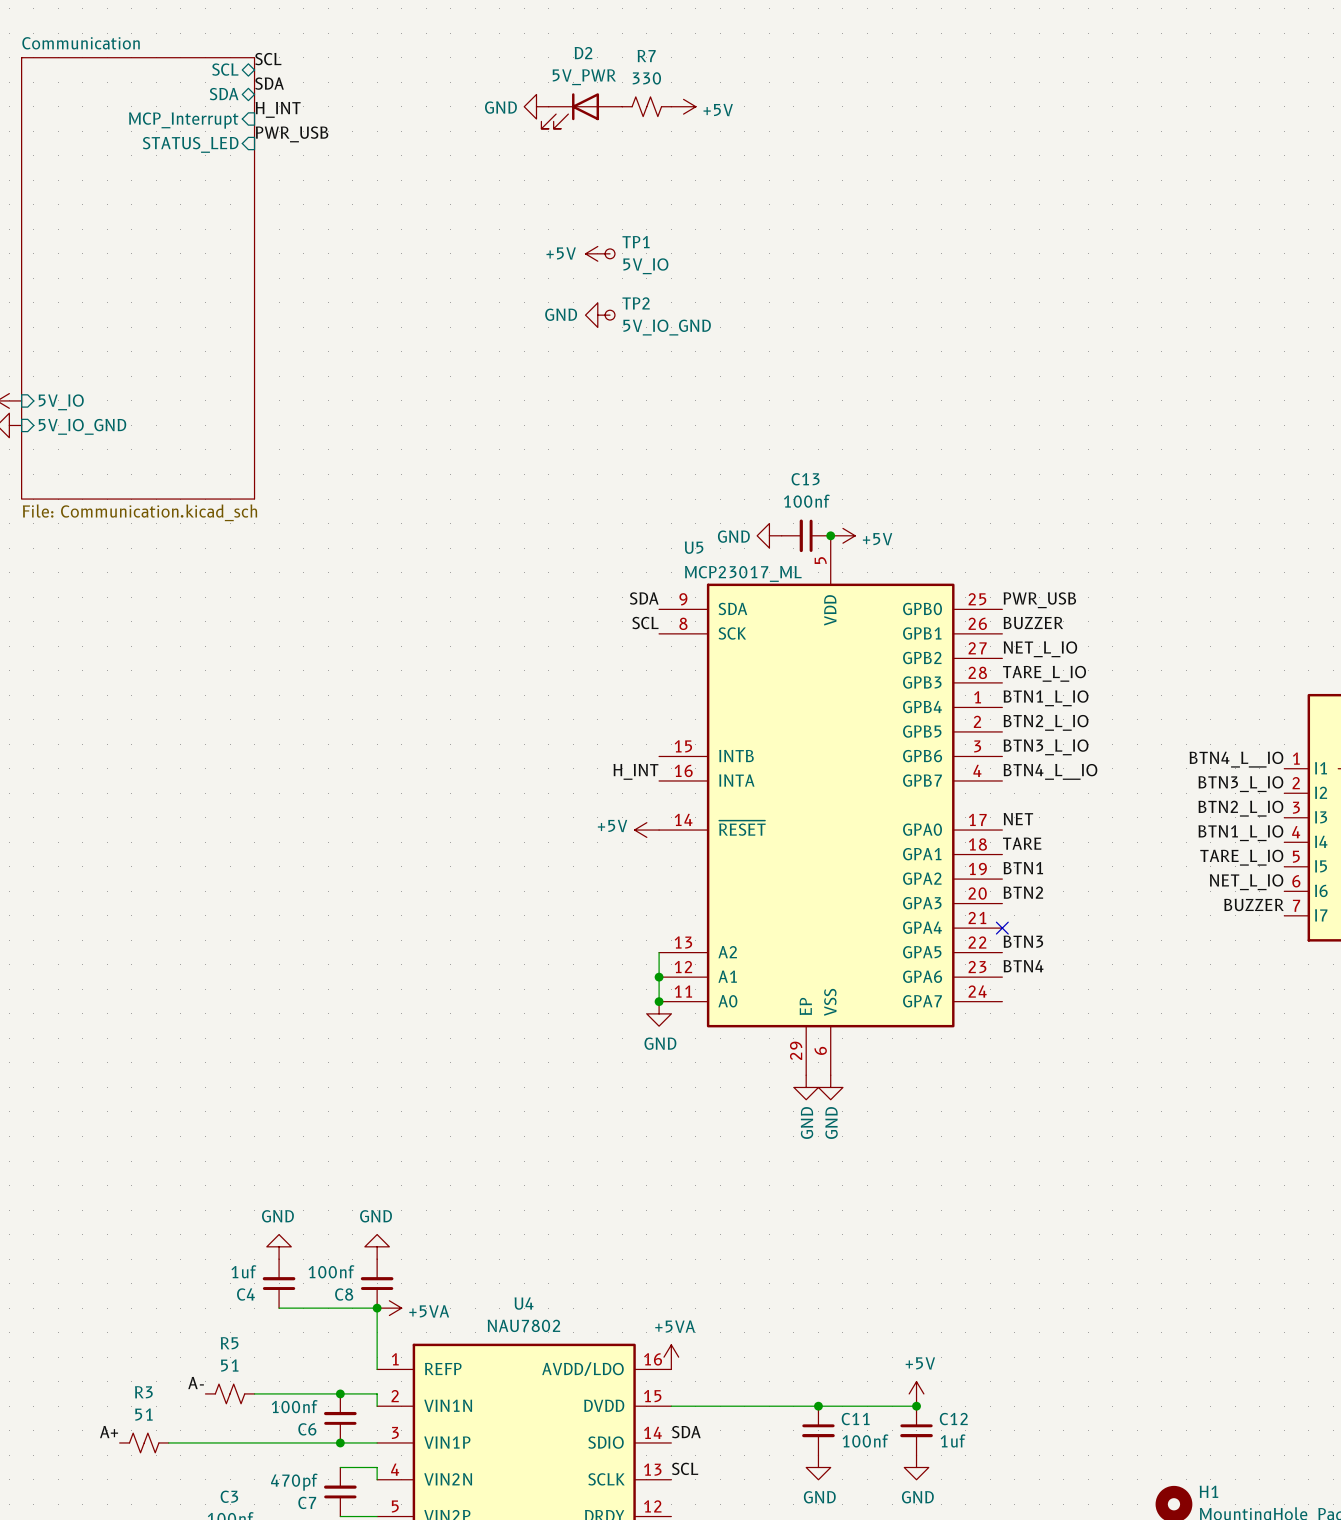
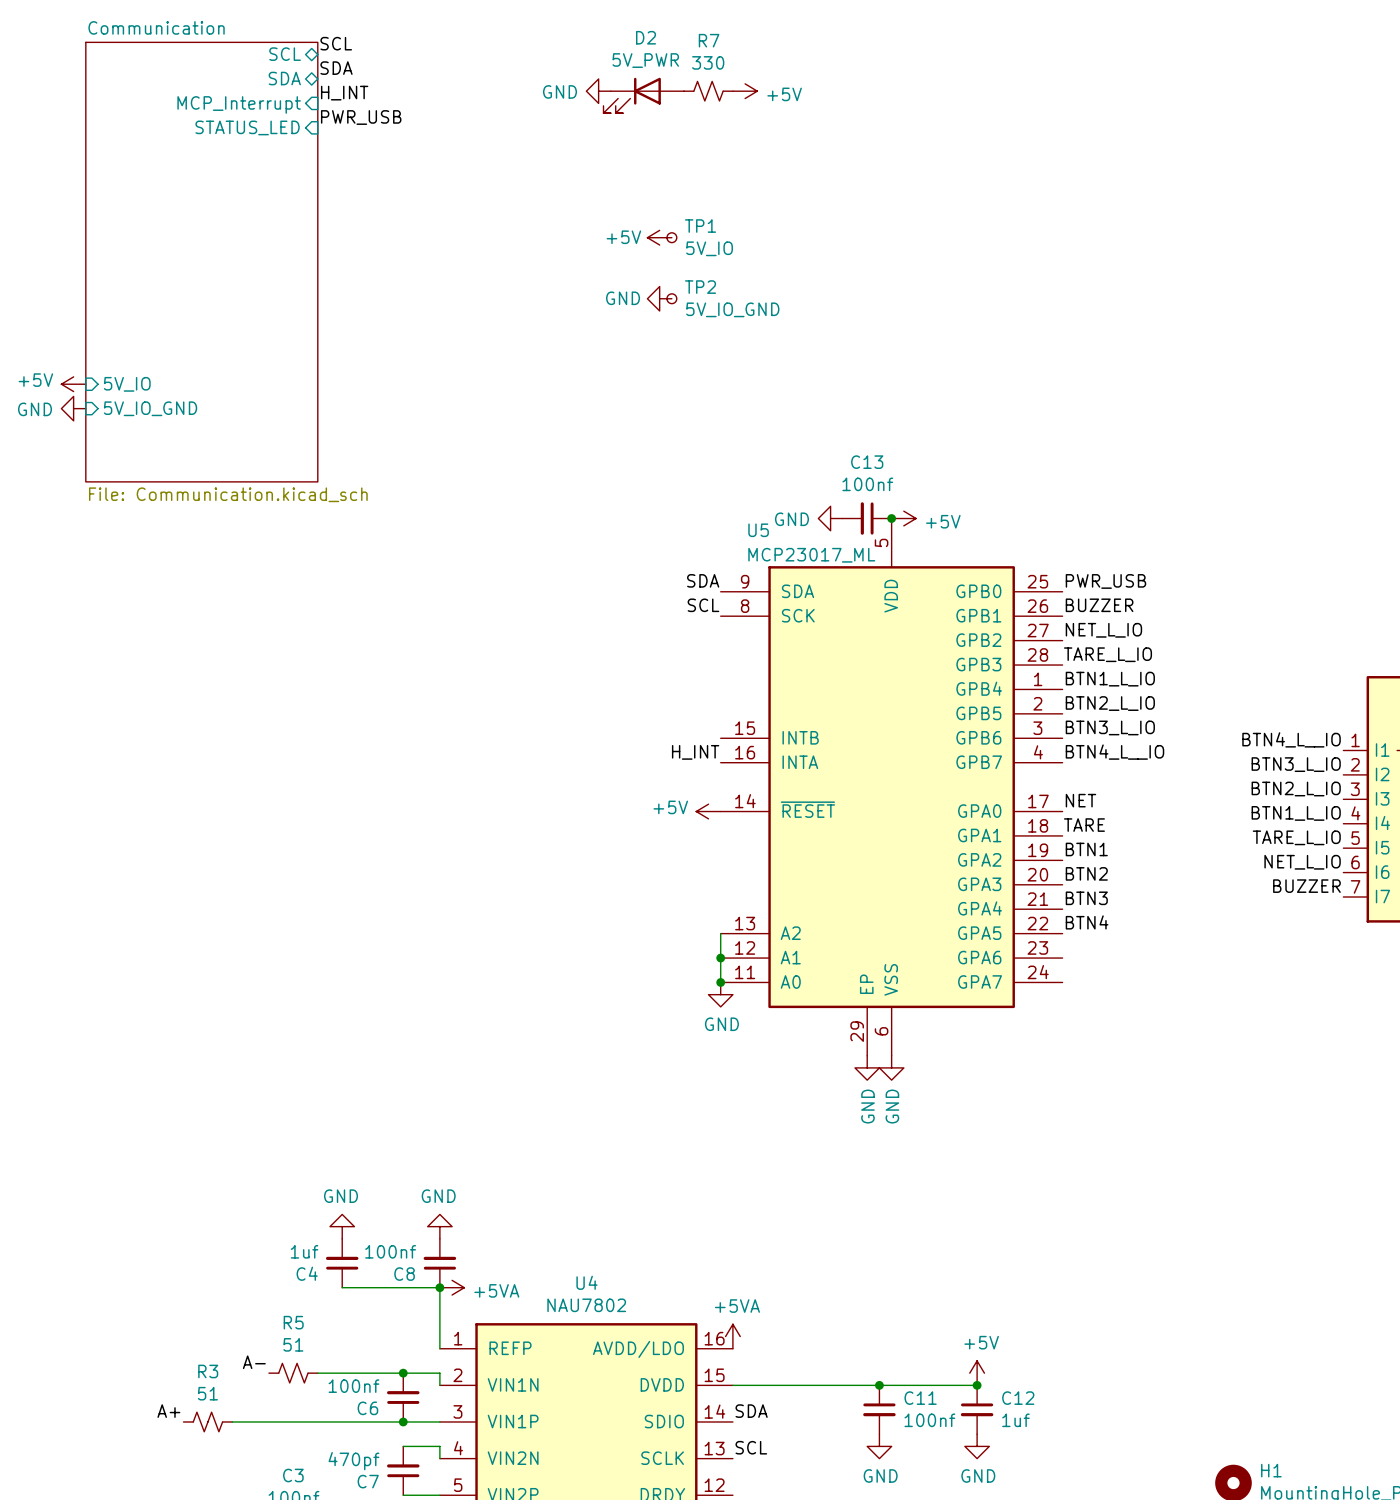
label: none -> BTN3 (1086, 898)
no-connect mark: (1002, 928) -> none
label: BTN3 (1023, 941) -> BTN4 (1087, 922)
label: BTN4 (1023, 966) -> none

